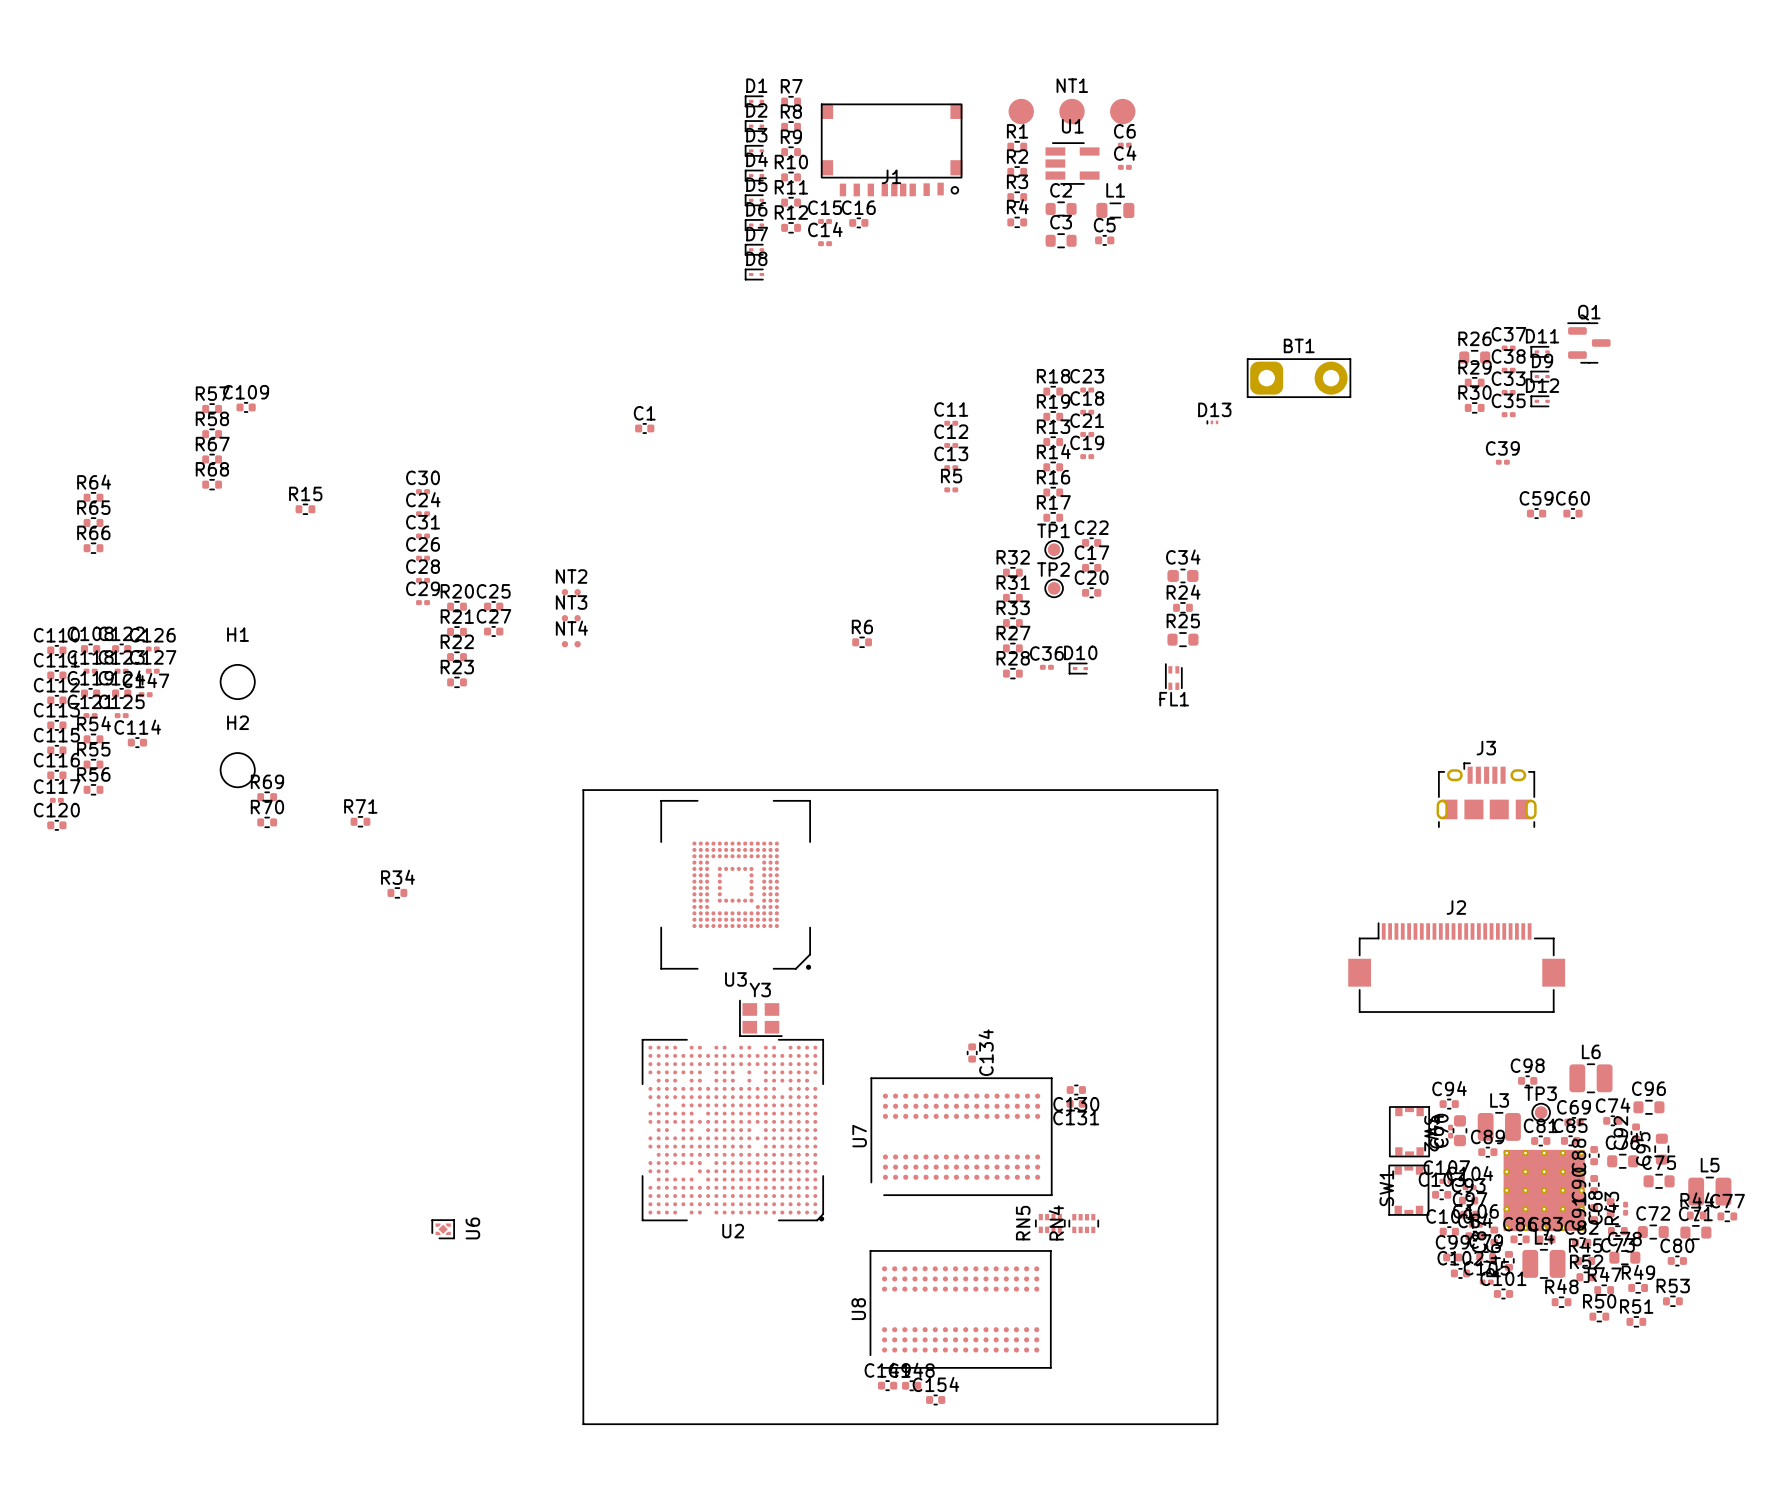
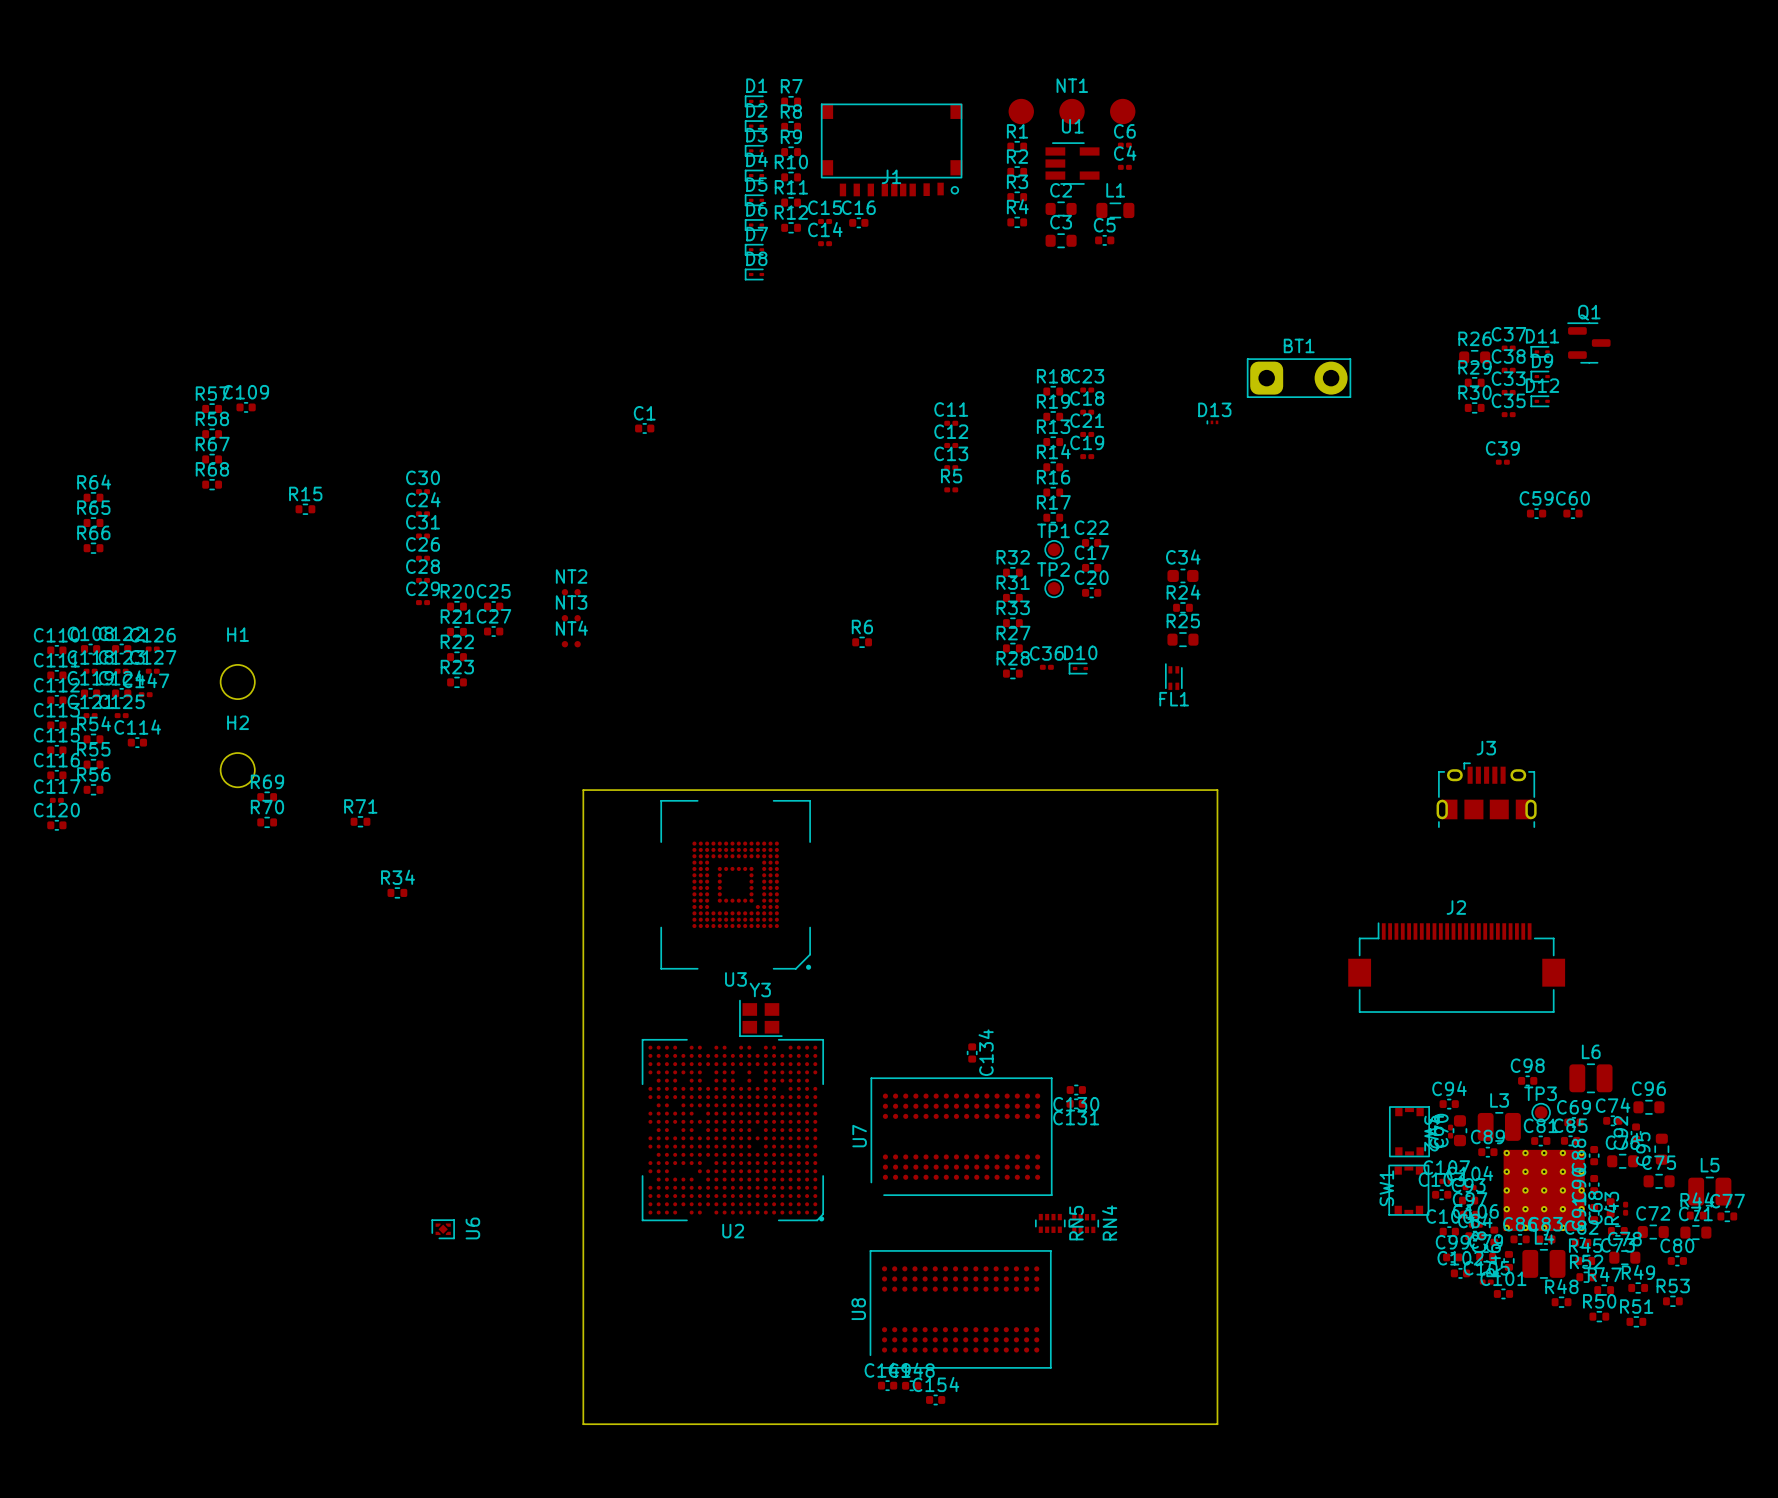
RN4 name position: RN4 (1056, 1222) -> RN4 (1109, 1222)
RN5 name position: RN5 (1023, 1223) -> RN5 (1076, 1223)

